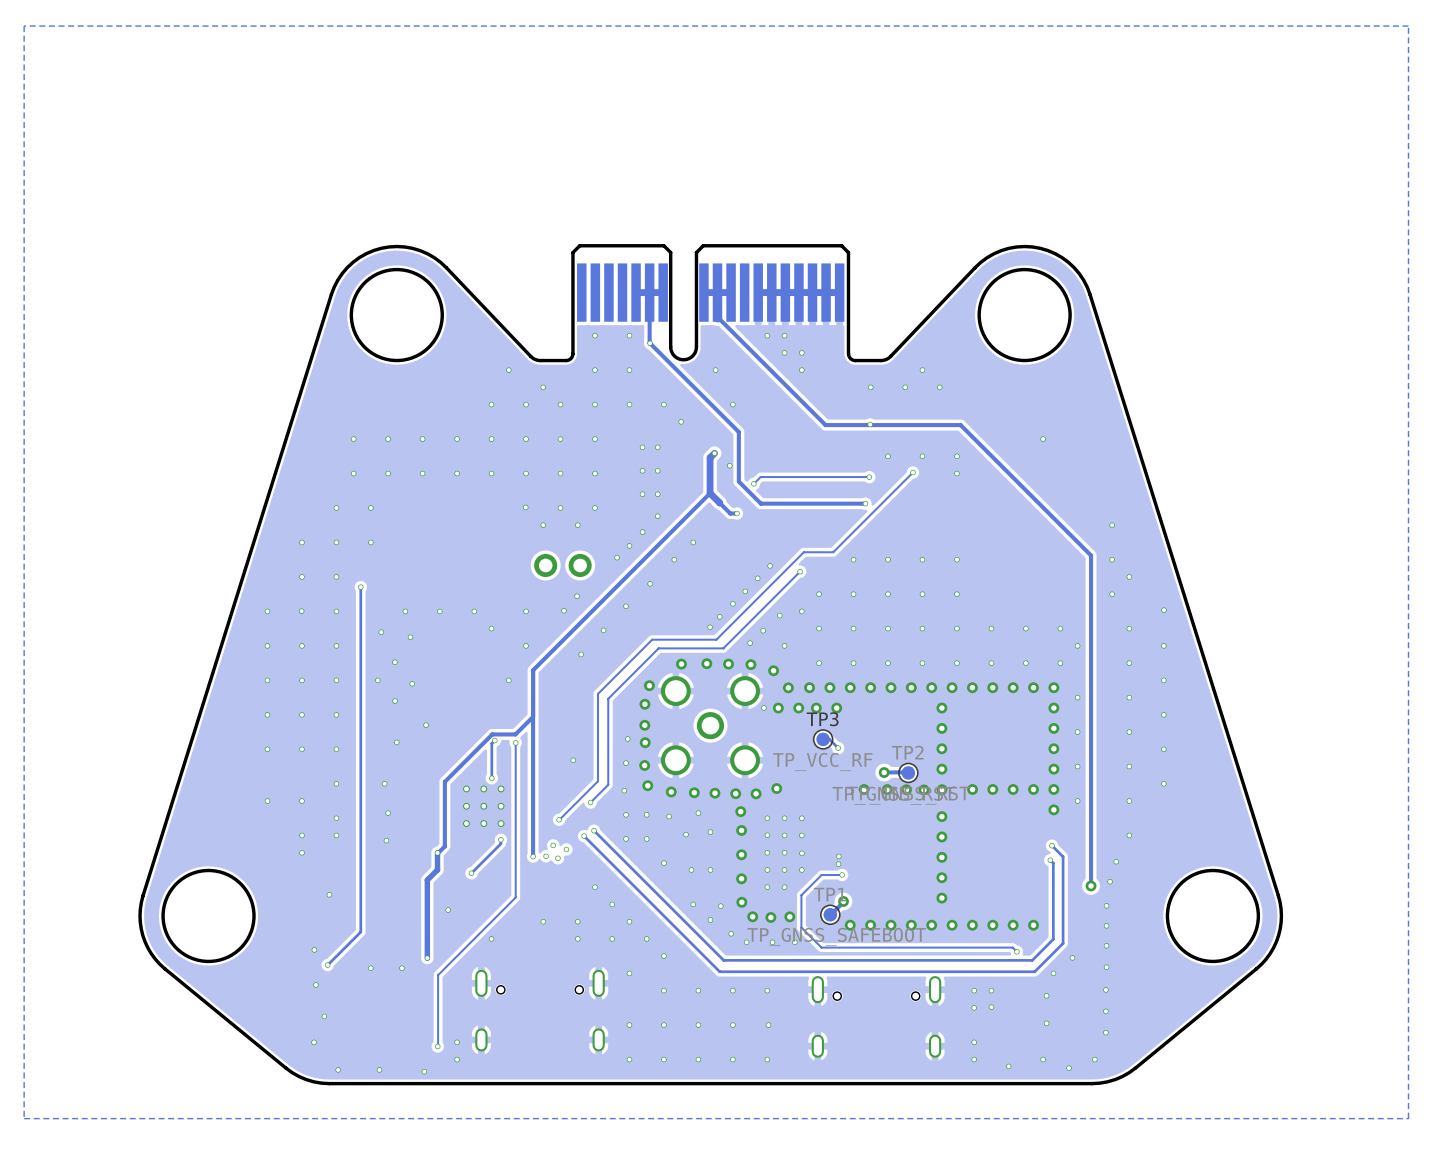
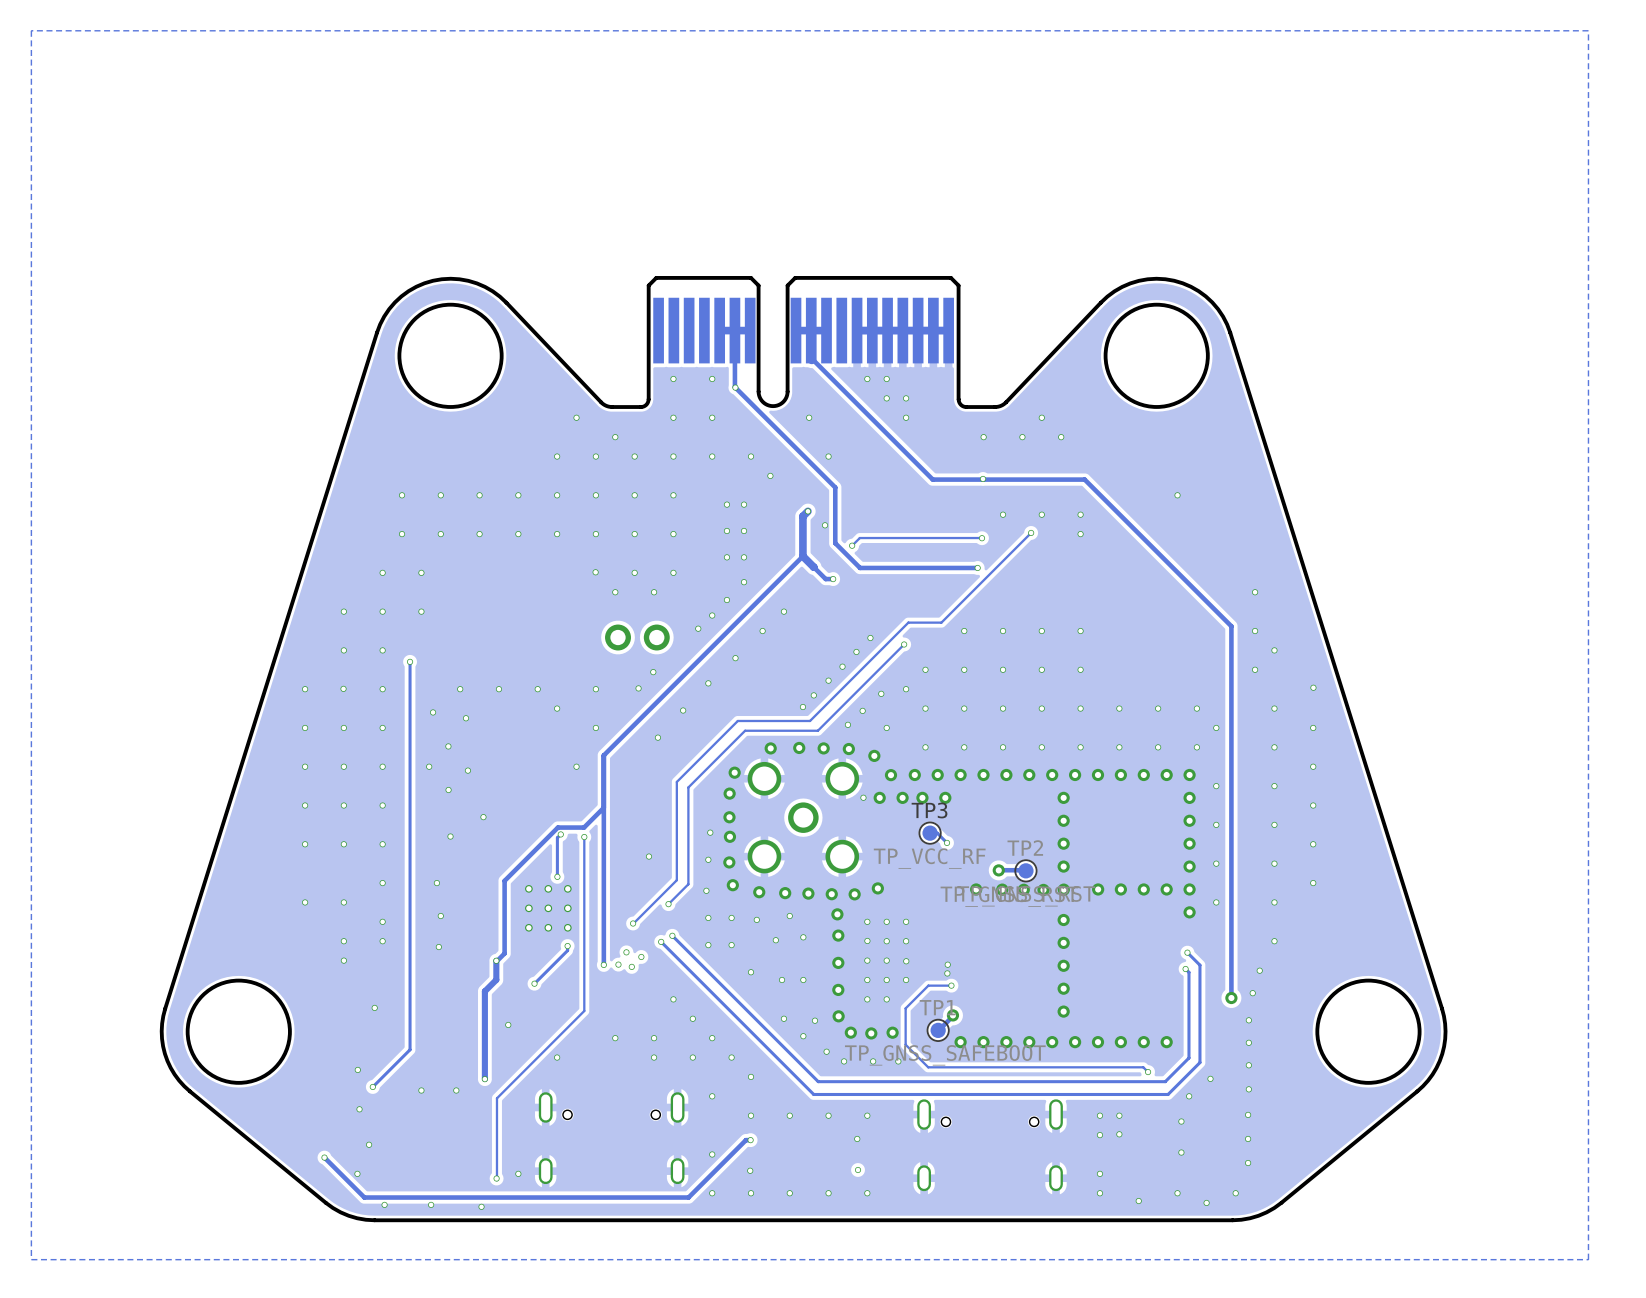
via: none -> (857, 1138)
track: none -> (750, 1140) (745, 1140) (688, 1197) (364, 1197) (324, 1157)
via: none -> (750, 1140)
via: (663, 1025) -> none
via: (698, 1025) -> none
via: (732, 1025) -> none
via: (768, 1025) -> none
via: none -> (324, 1157)
via: none -> (858, 1169)
via: none -> (750, 1170)
via: (457, 1059) -> none

